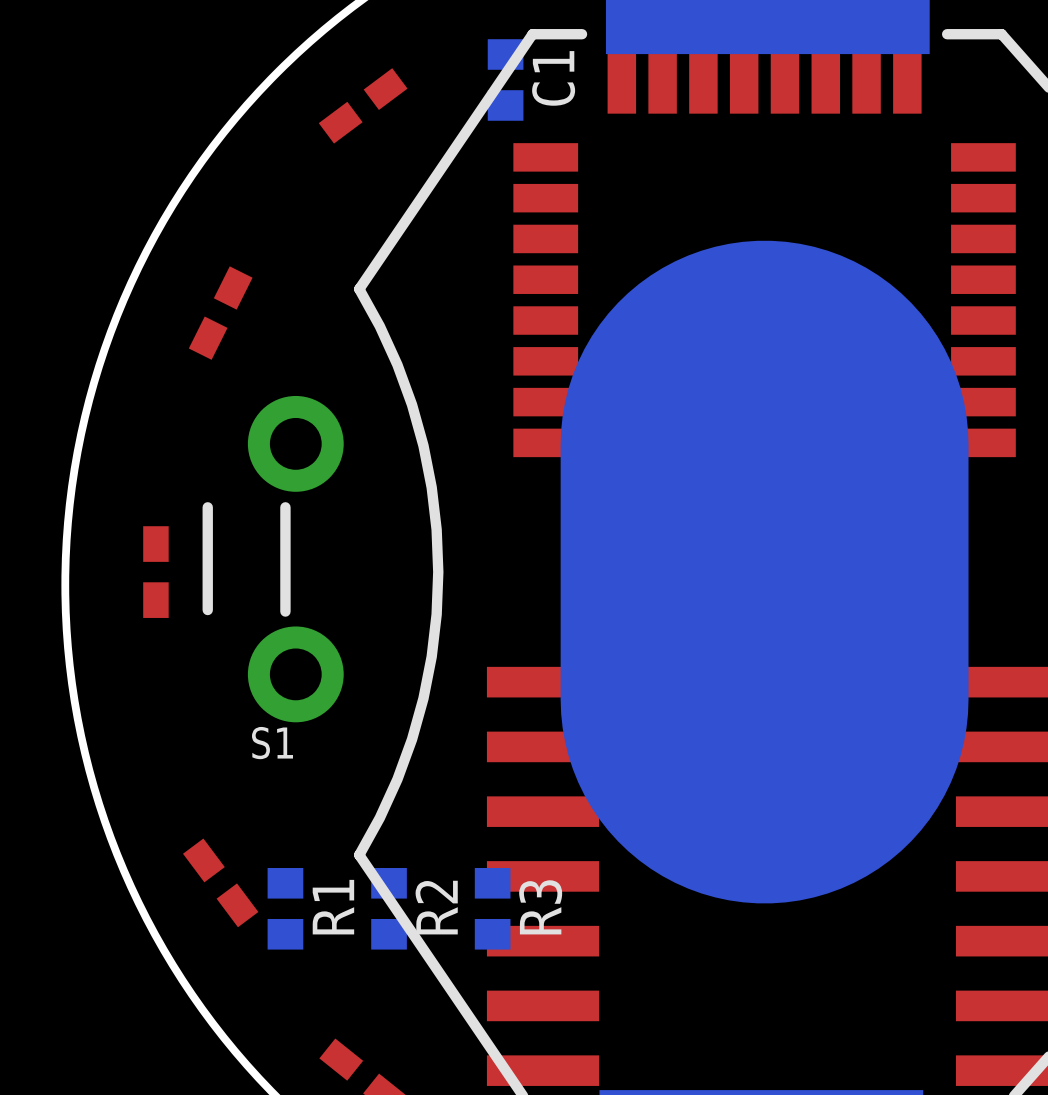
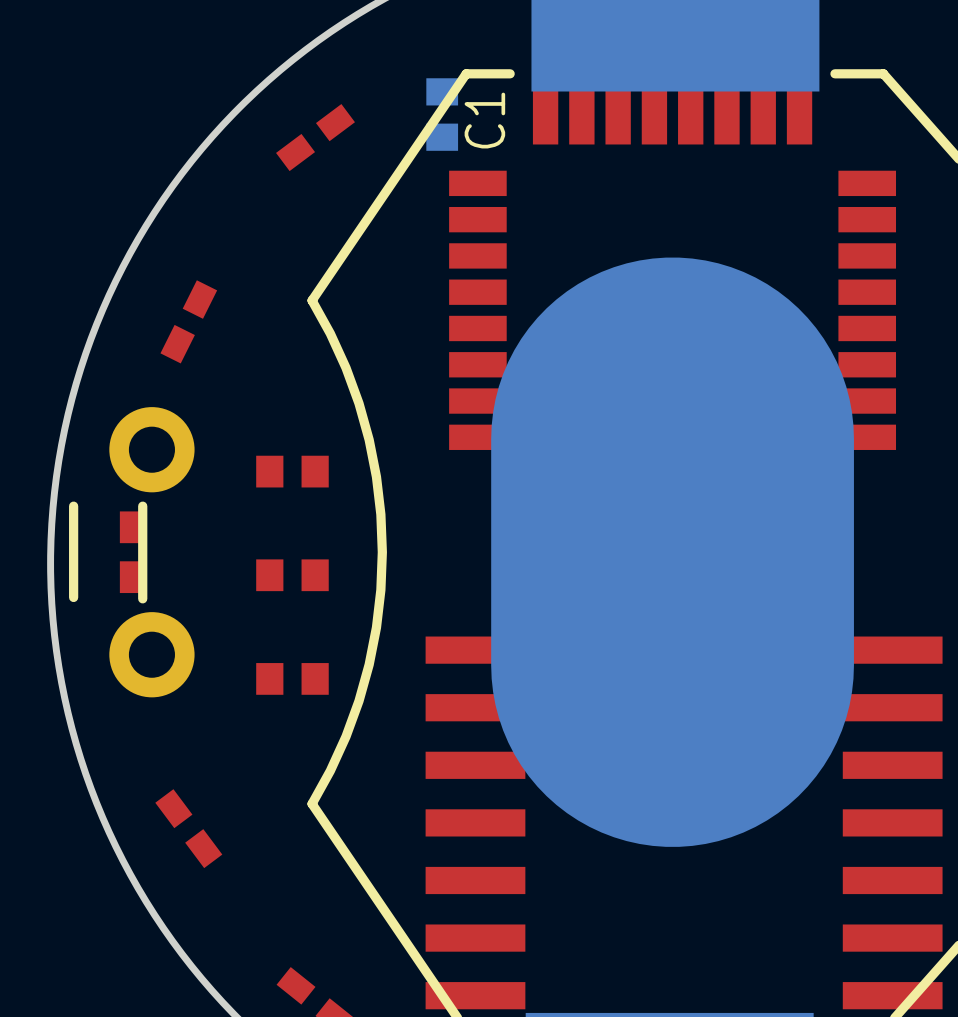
S1: (273, 559) -> none
part: none -> (131, 552)
R1 side: bottom (285, 908) -> top (292, 678)
R2 side: bottom (389, 908) -> top (292, 471)
R3 side: bottom (492, 908) -> top (292, 575)

